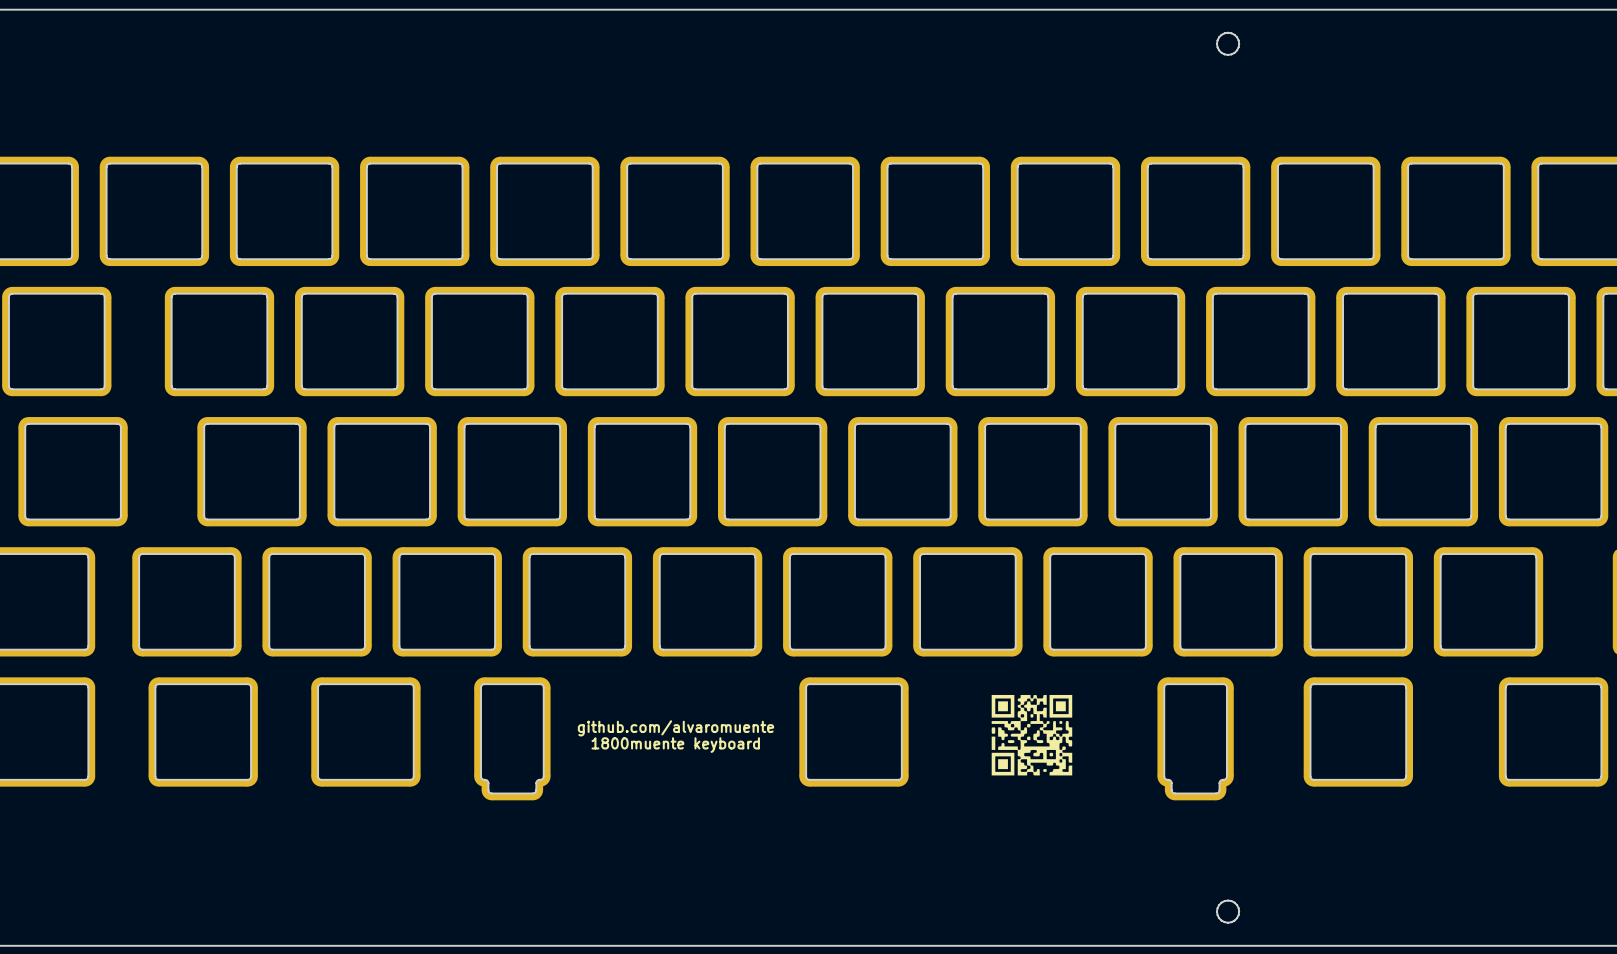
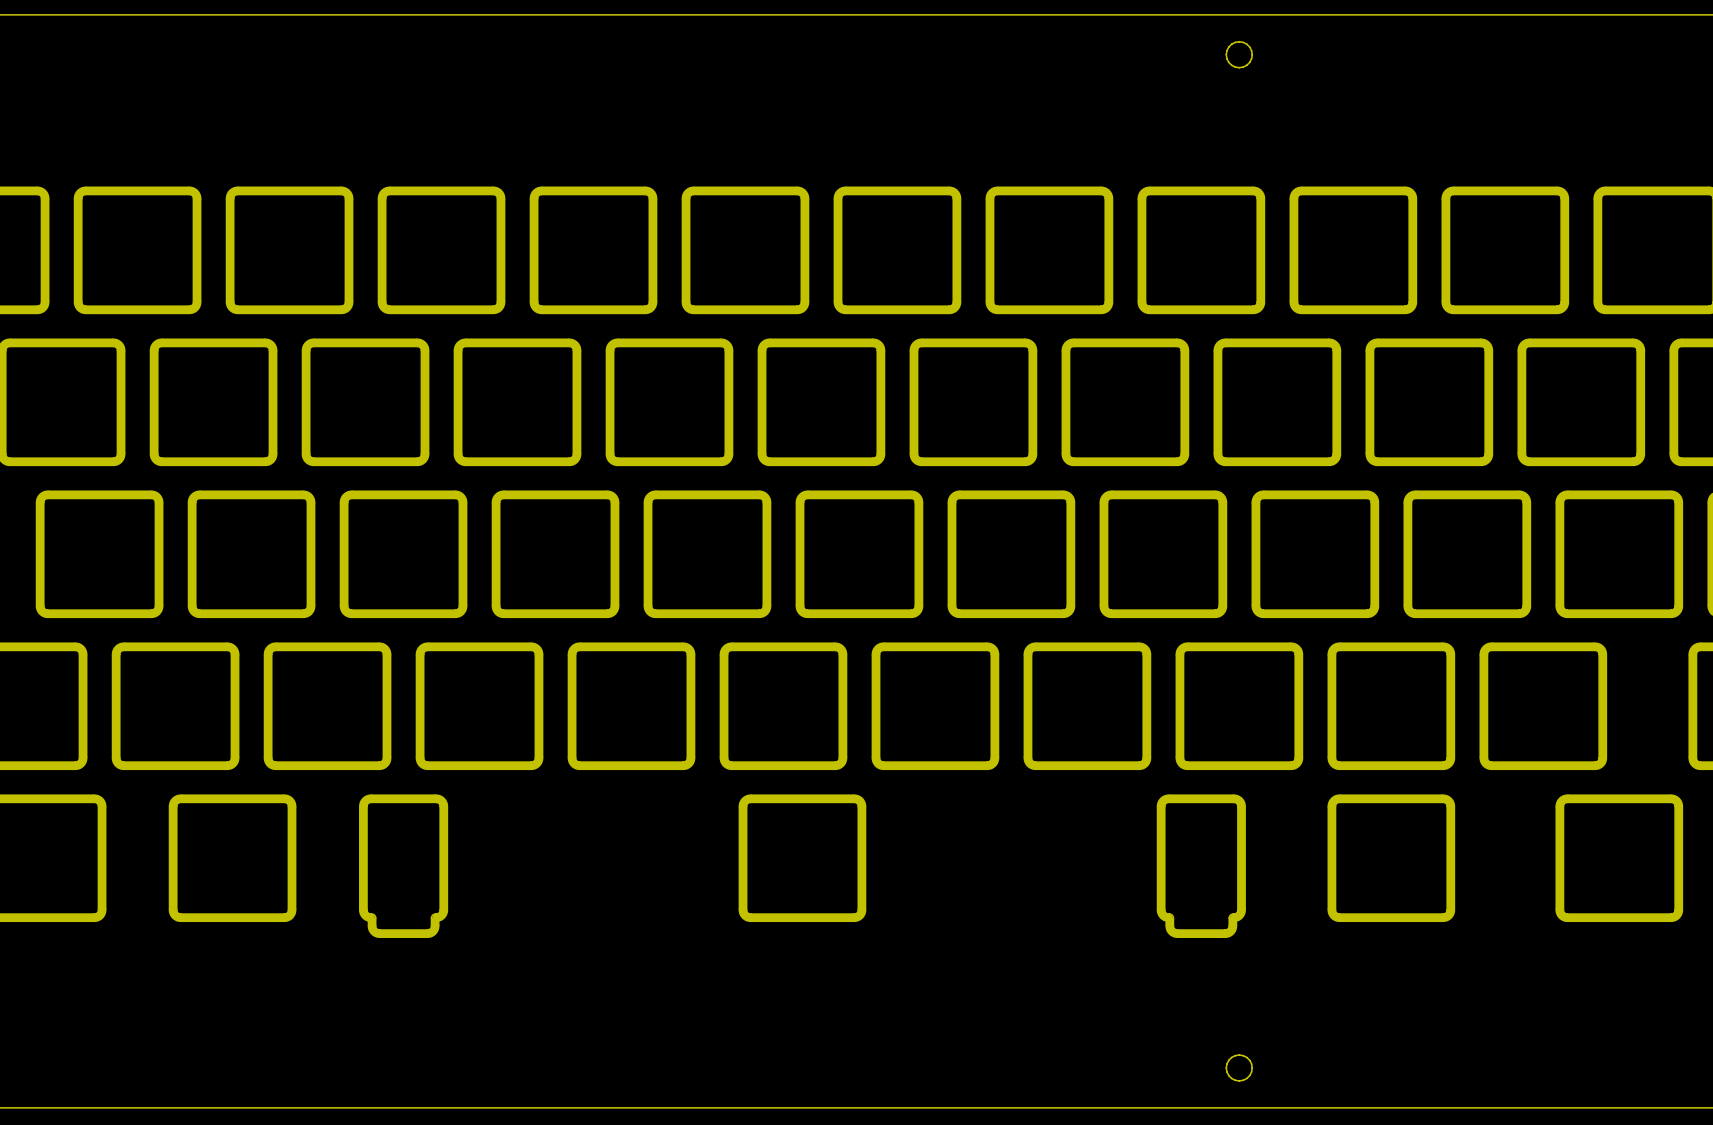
drawing: [991, 694, 1073, 776] -> none
text: github.com/alvaromuente (675, 728) -> none
text: 1800muente keyboard (675, 745) -> none

